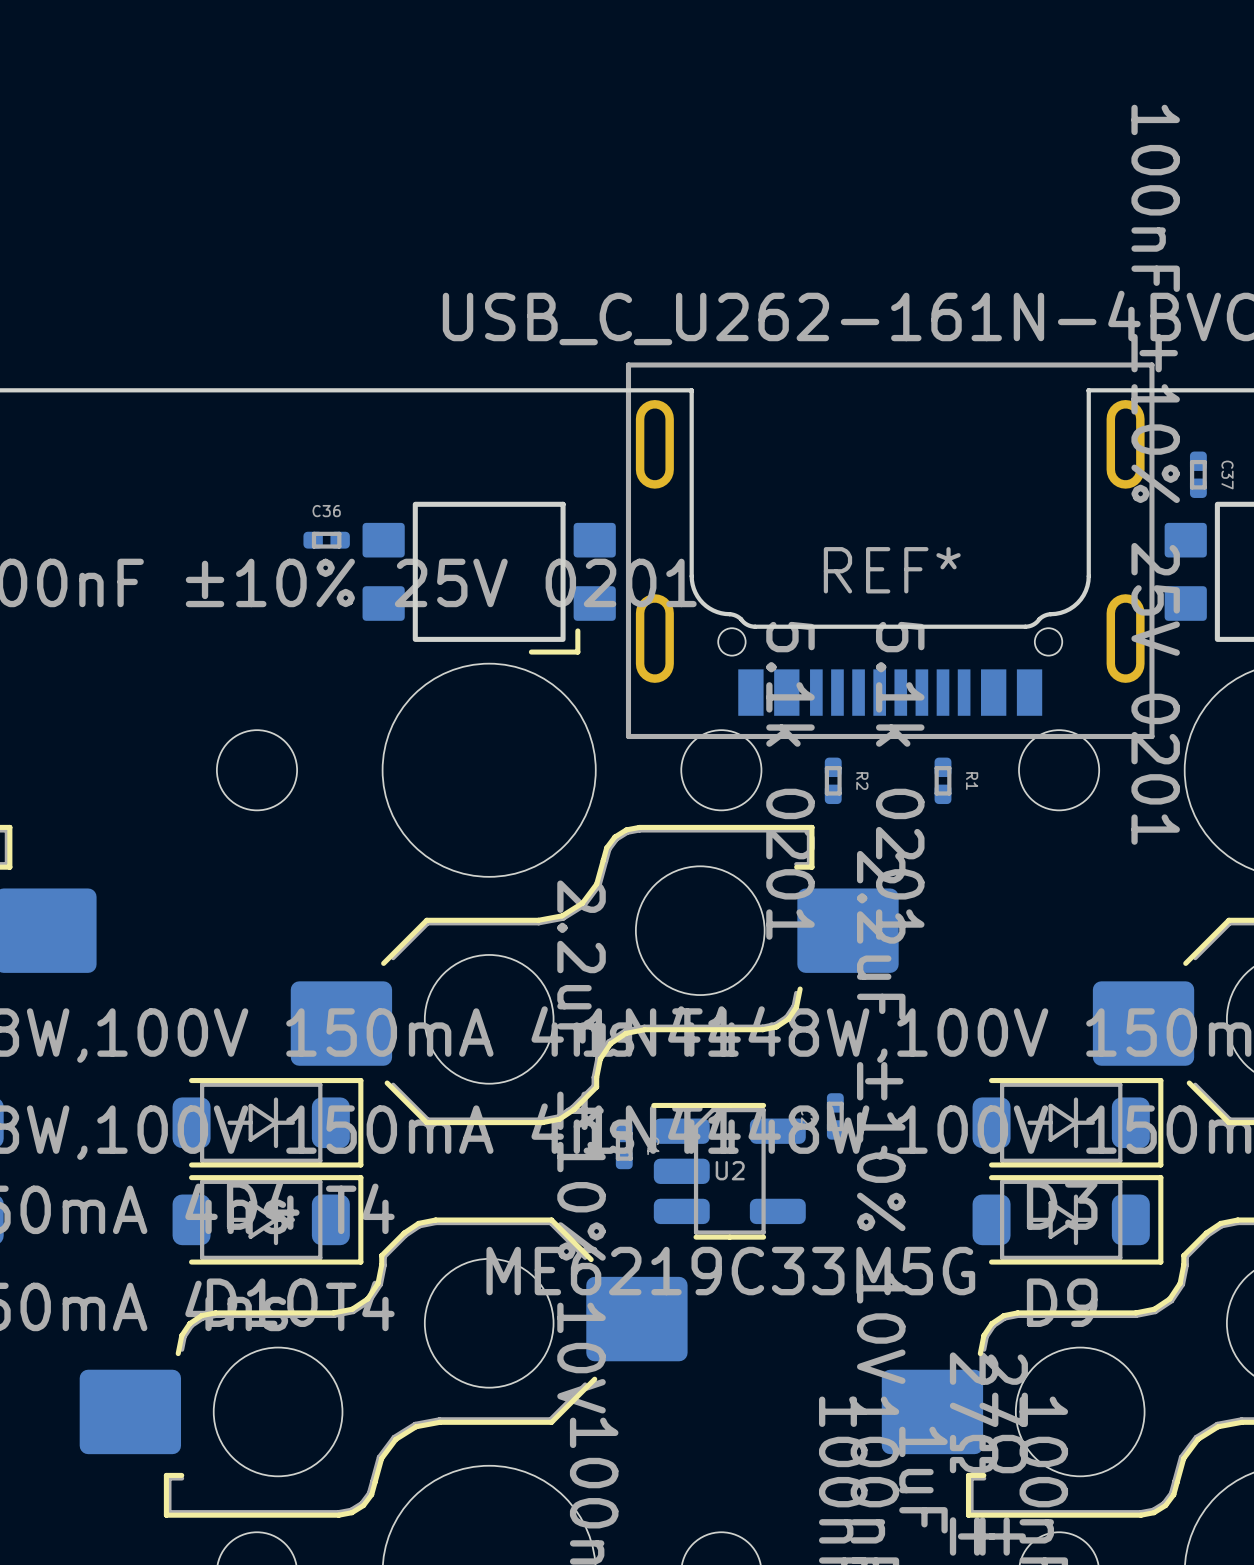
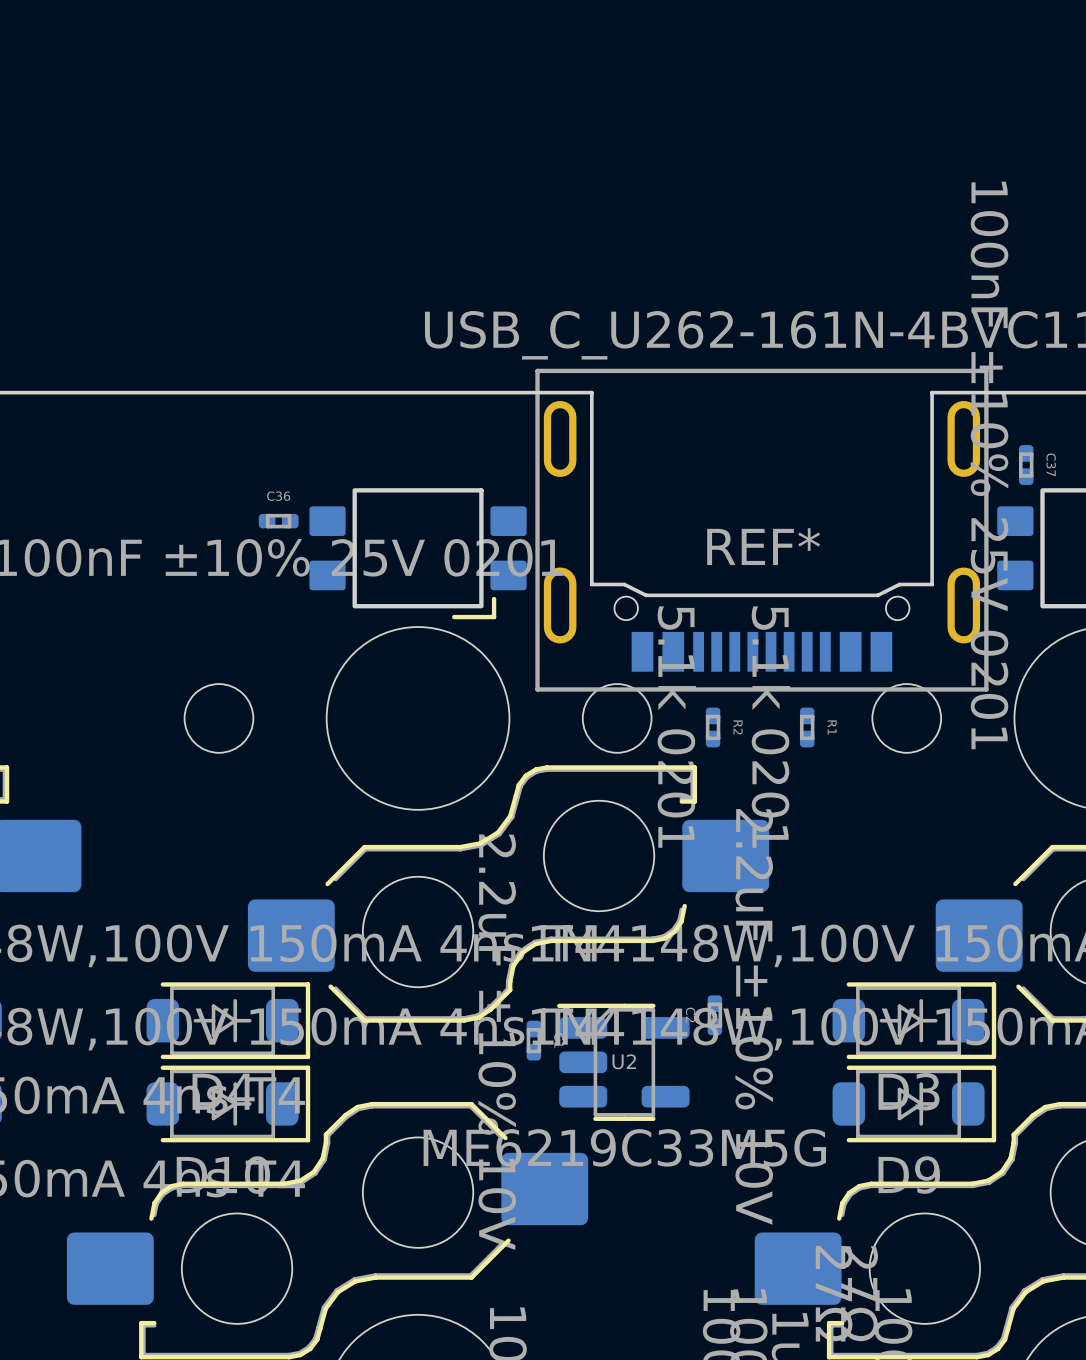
part footprint: [625, 362, 1155, 740] -> [535, 368, 989, 692]

